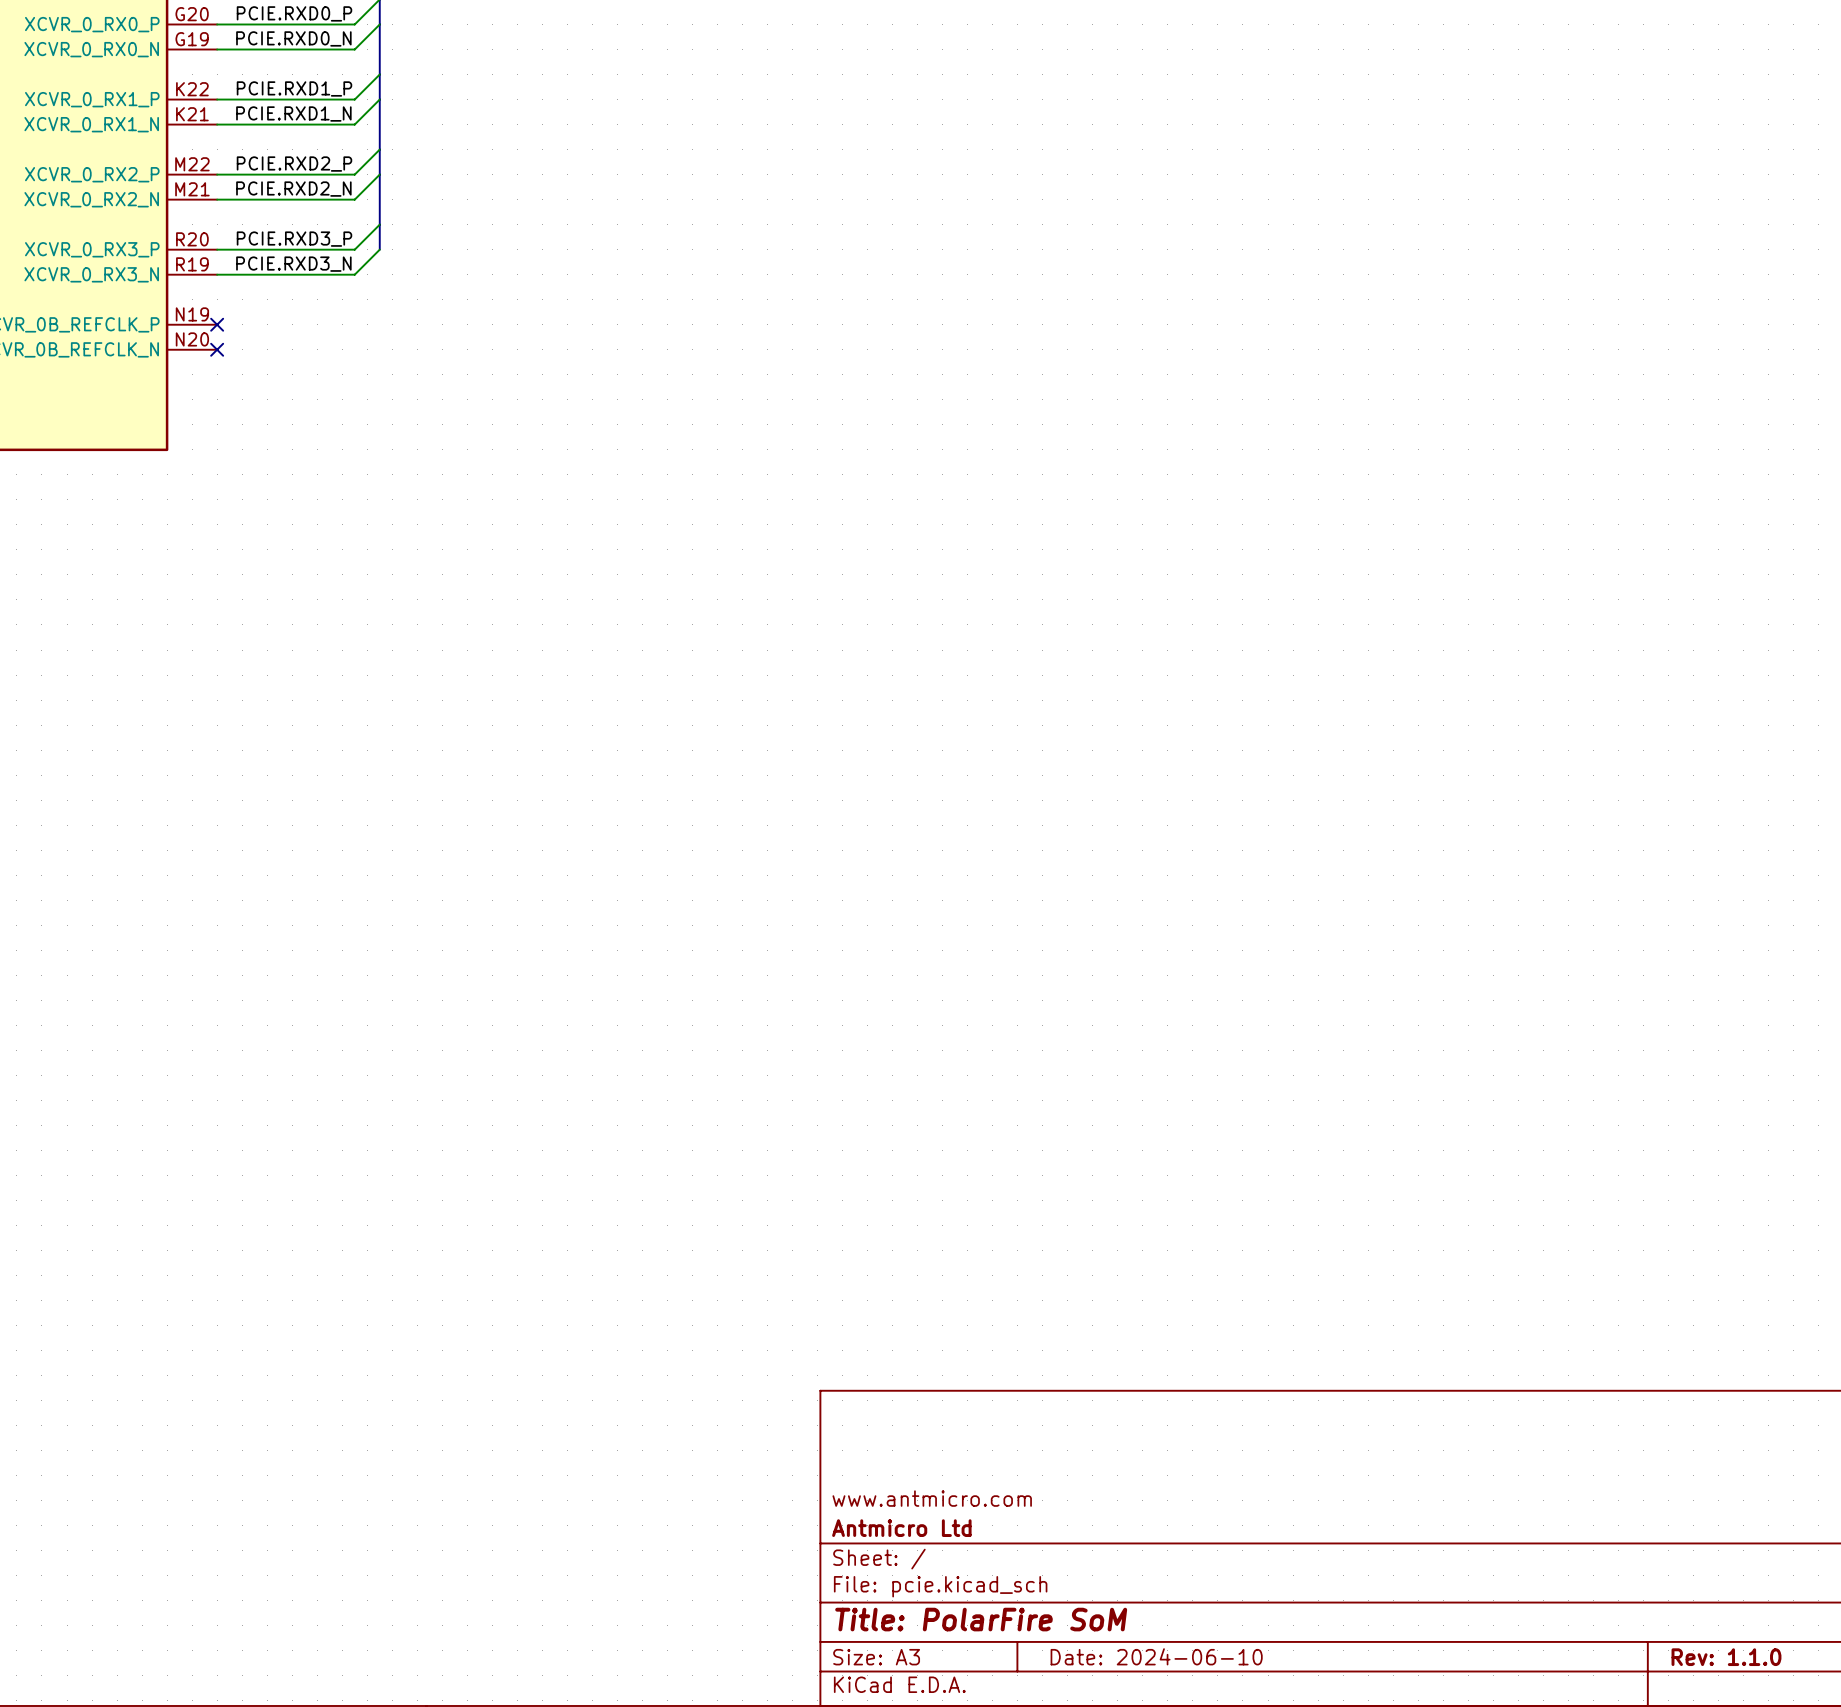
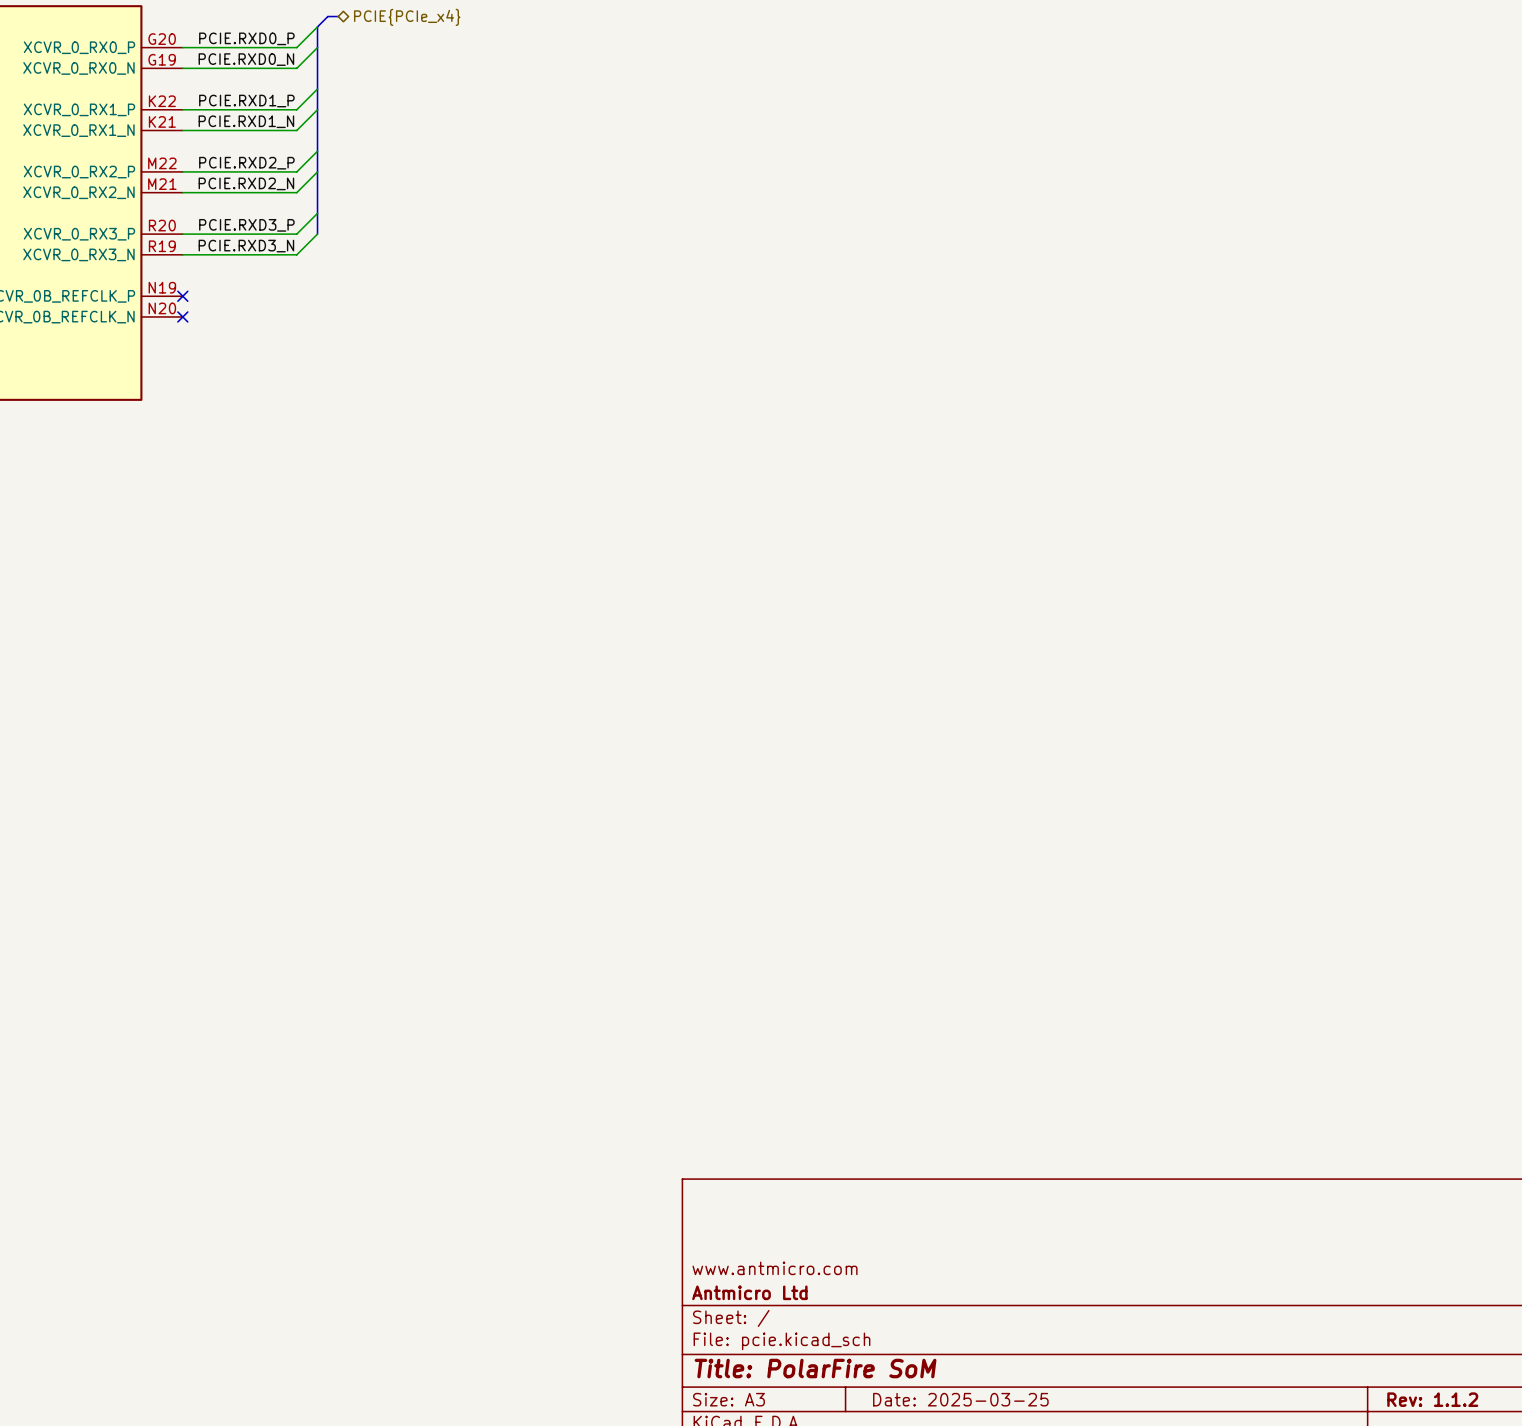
title block: Date: 2024-06-10 (1156, 1656) -> Date: 2025-03-25 (960, 1399)
title block: Rev: 1.1.0 (1726, 1657) -> Rev: 1.1.2 (1432, 1399)

